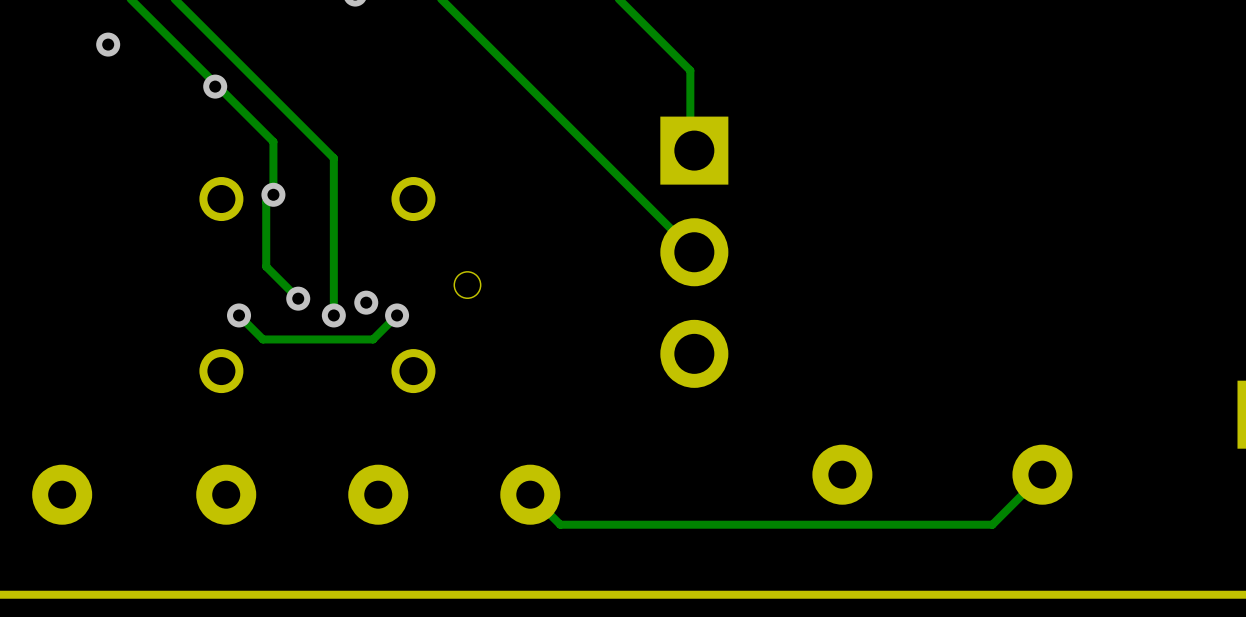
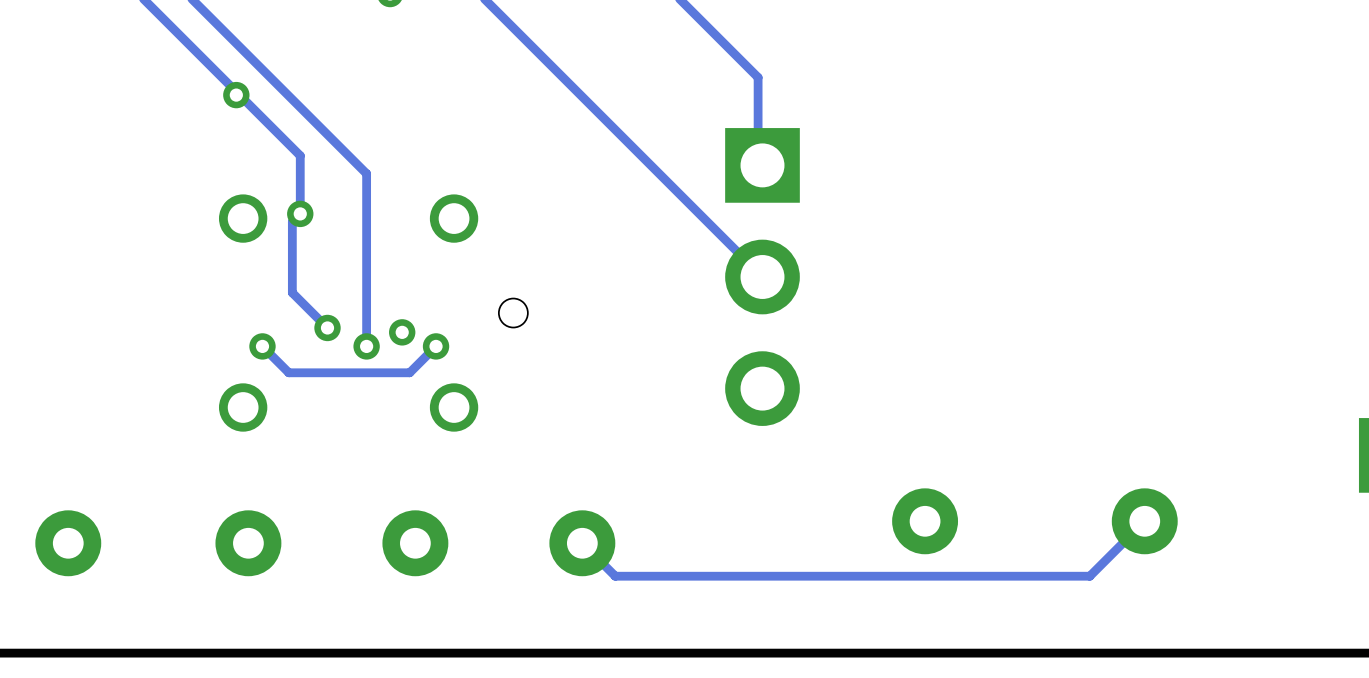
via: (108, 44) -> none

